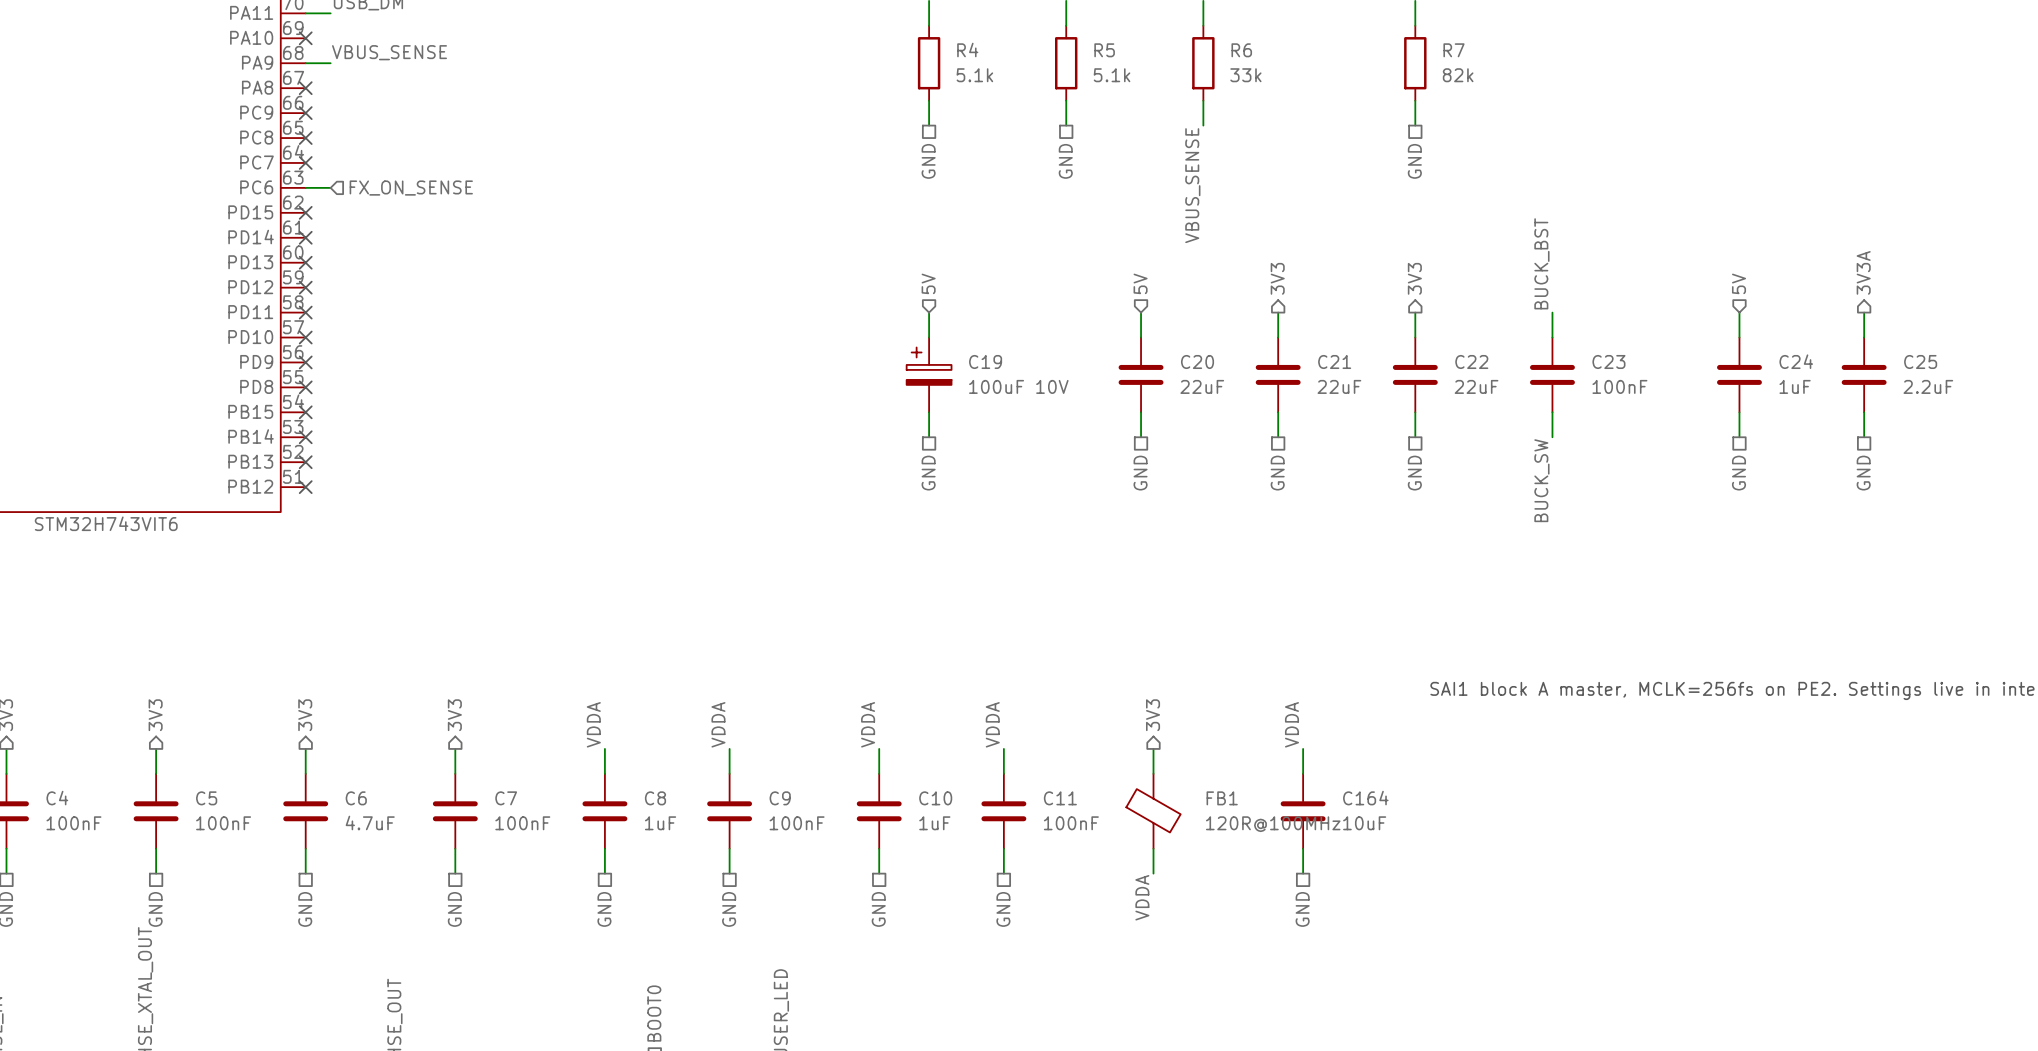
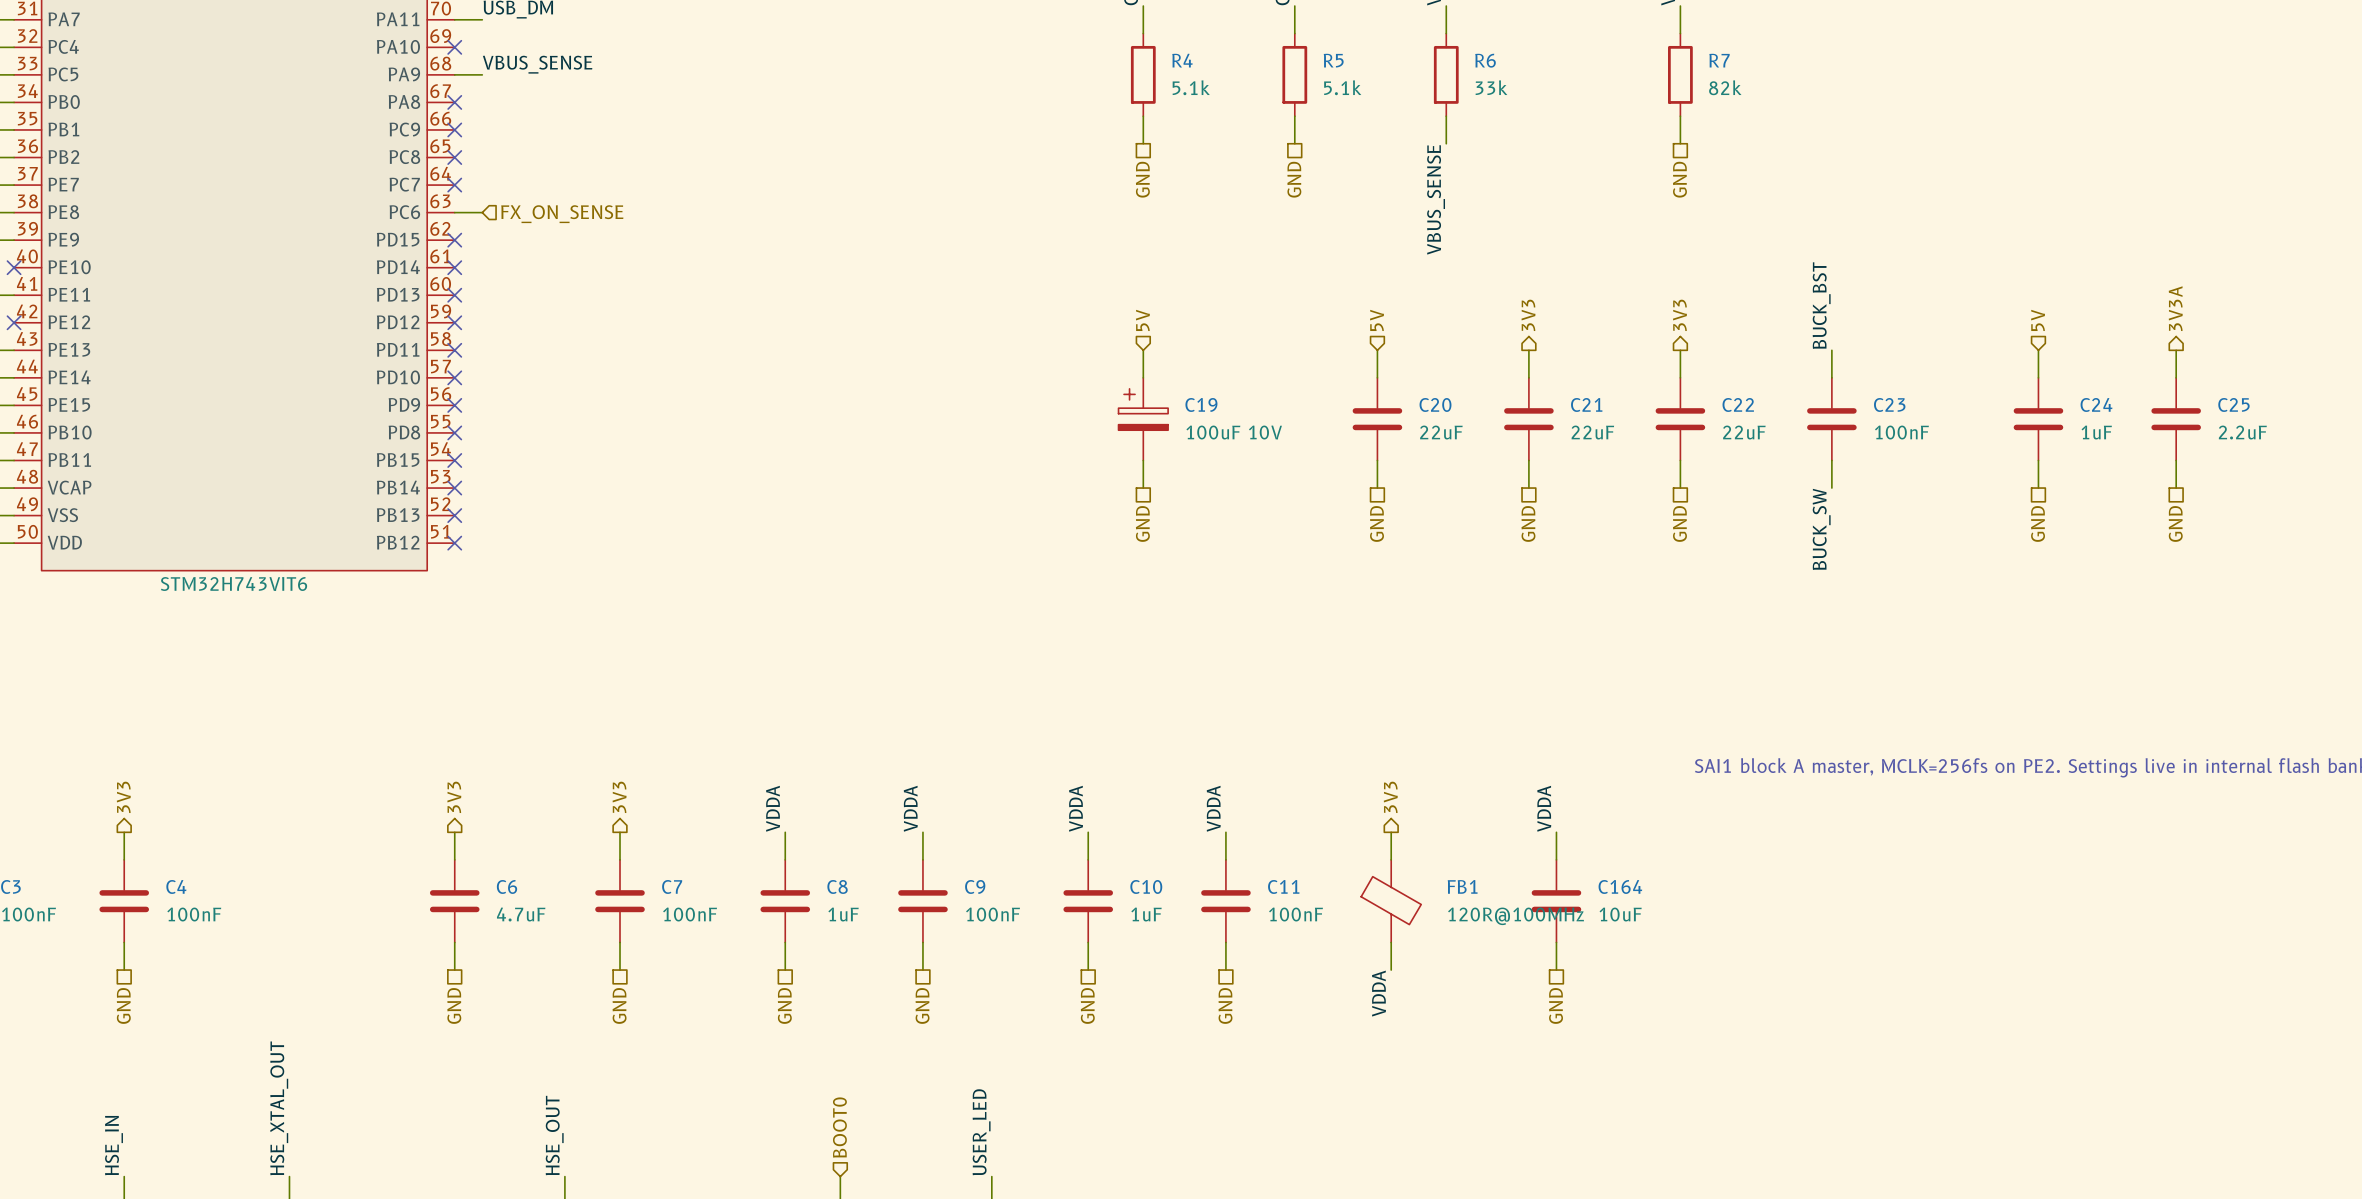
hierarchical label: 3V3 (155, 715) -> none
wire: (156, 748) (156, 773) -> none
C5: 100nF (156, 811) -> none
wire: (156, 848) (156, 873) -> none
hierarchical label: GND (155, 909) -> none

